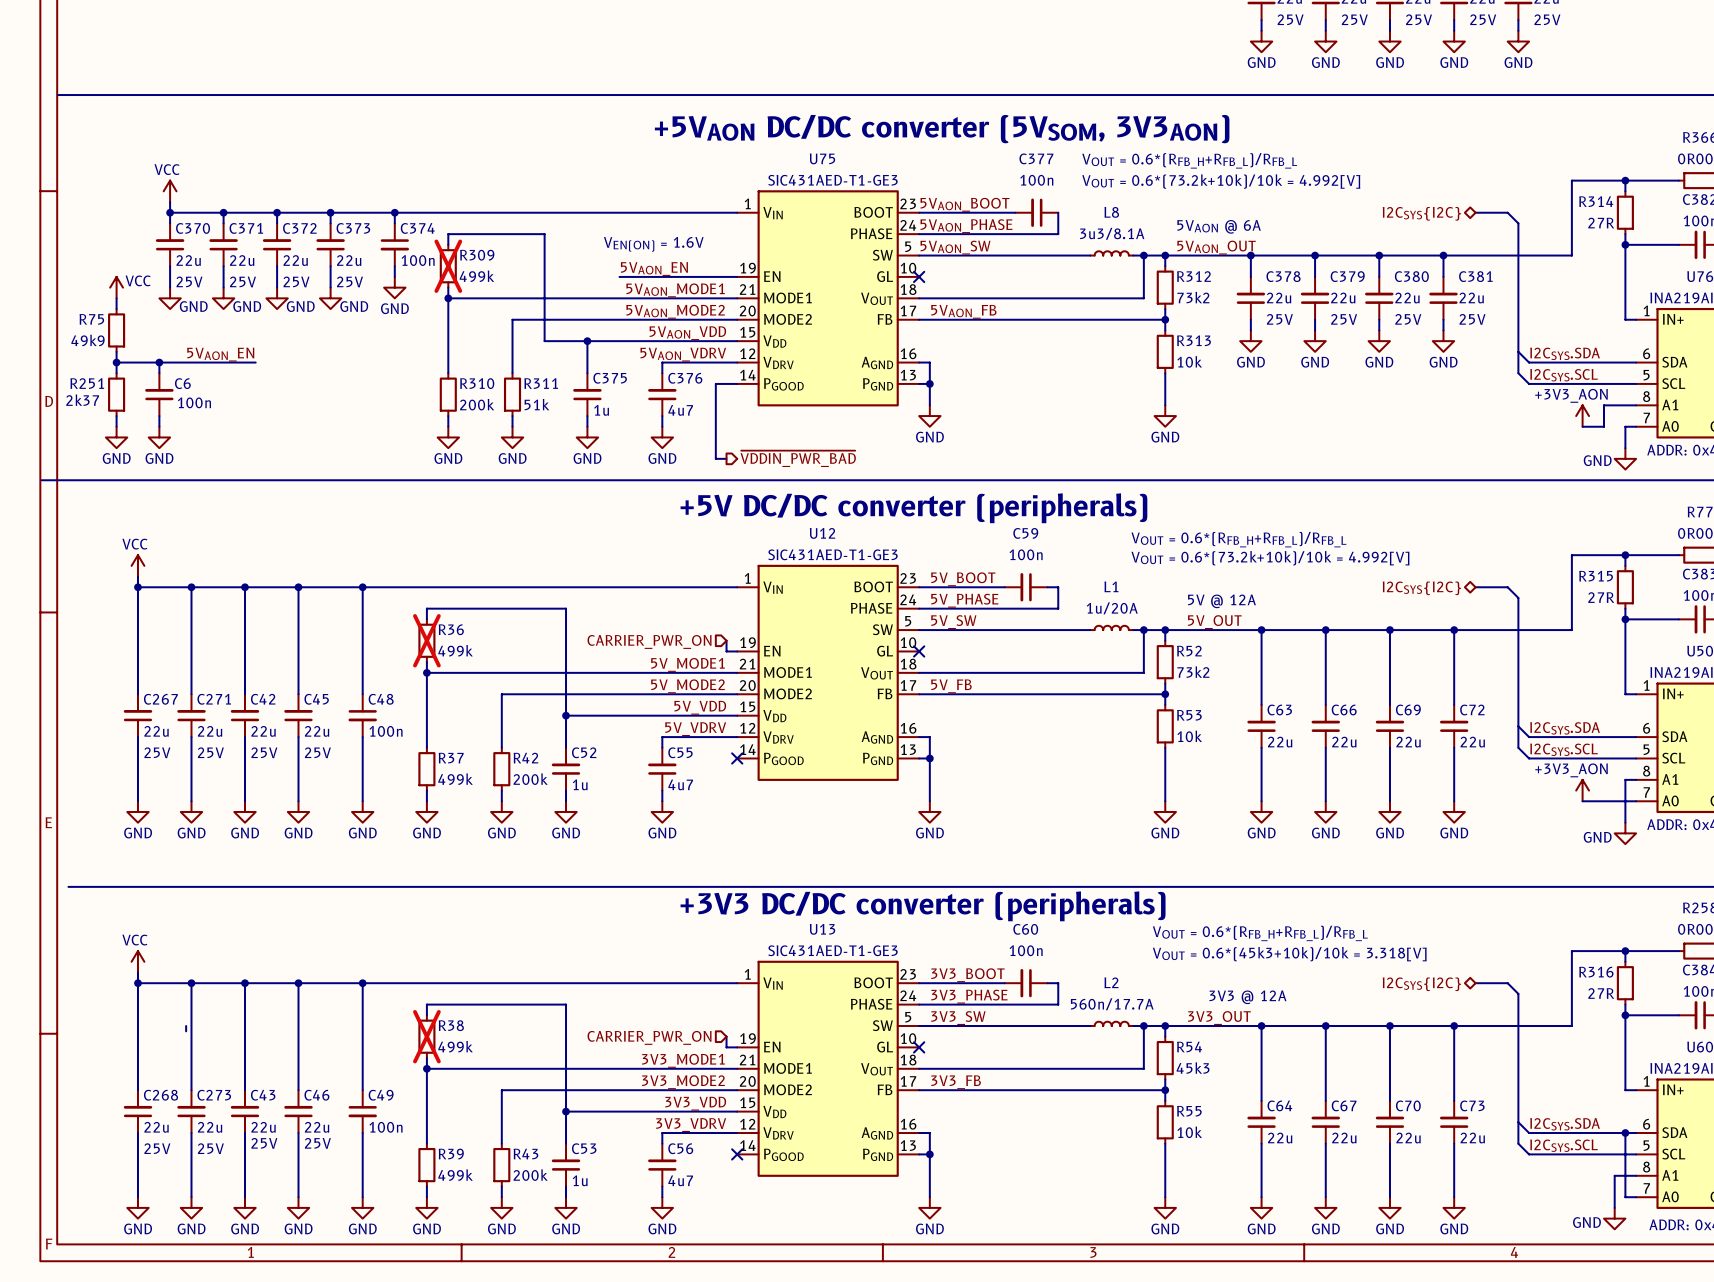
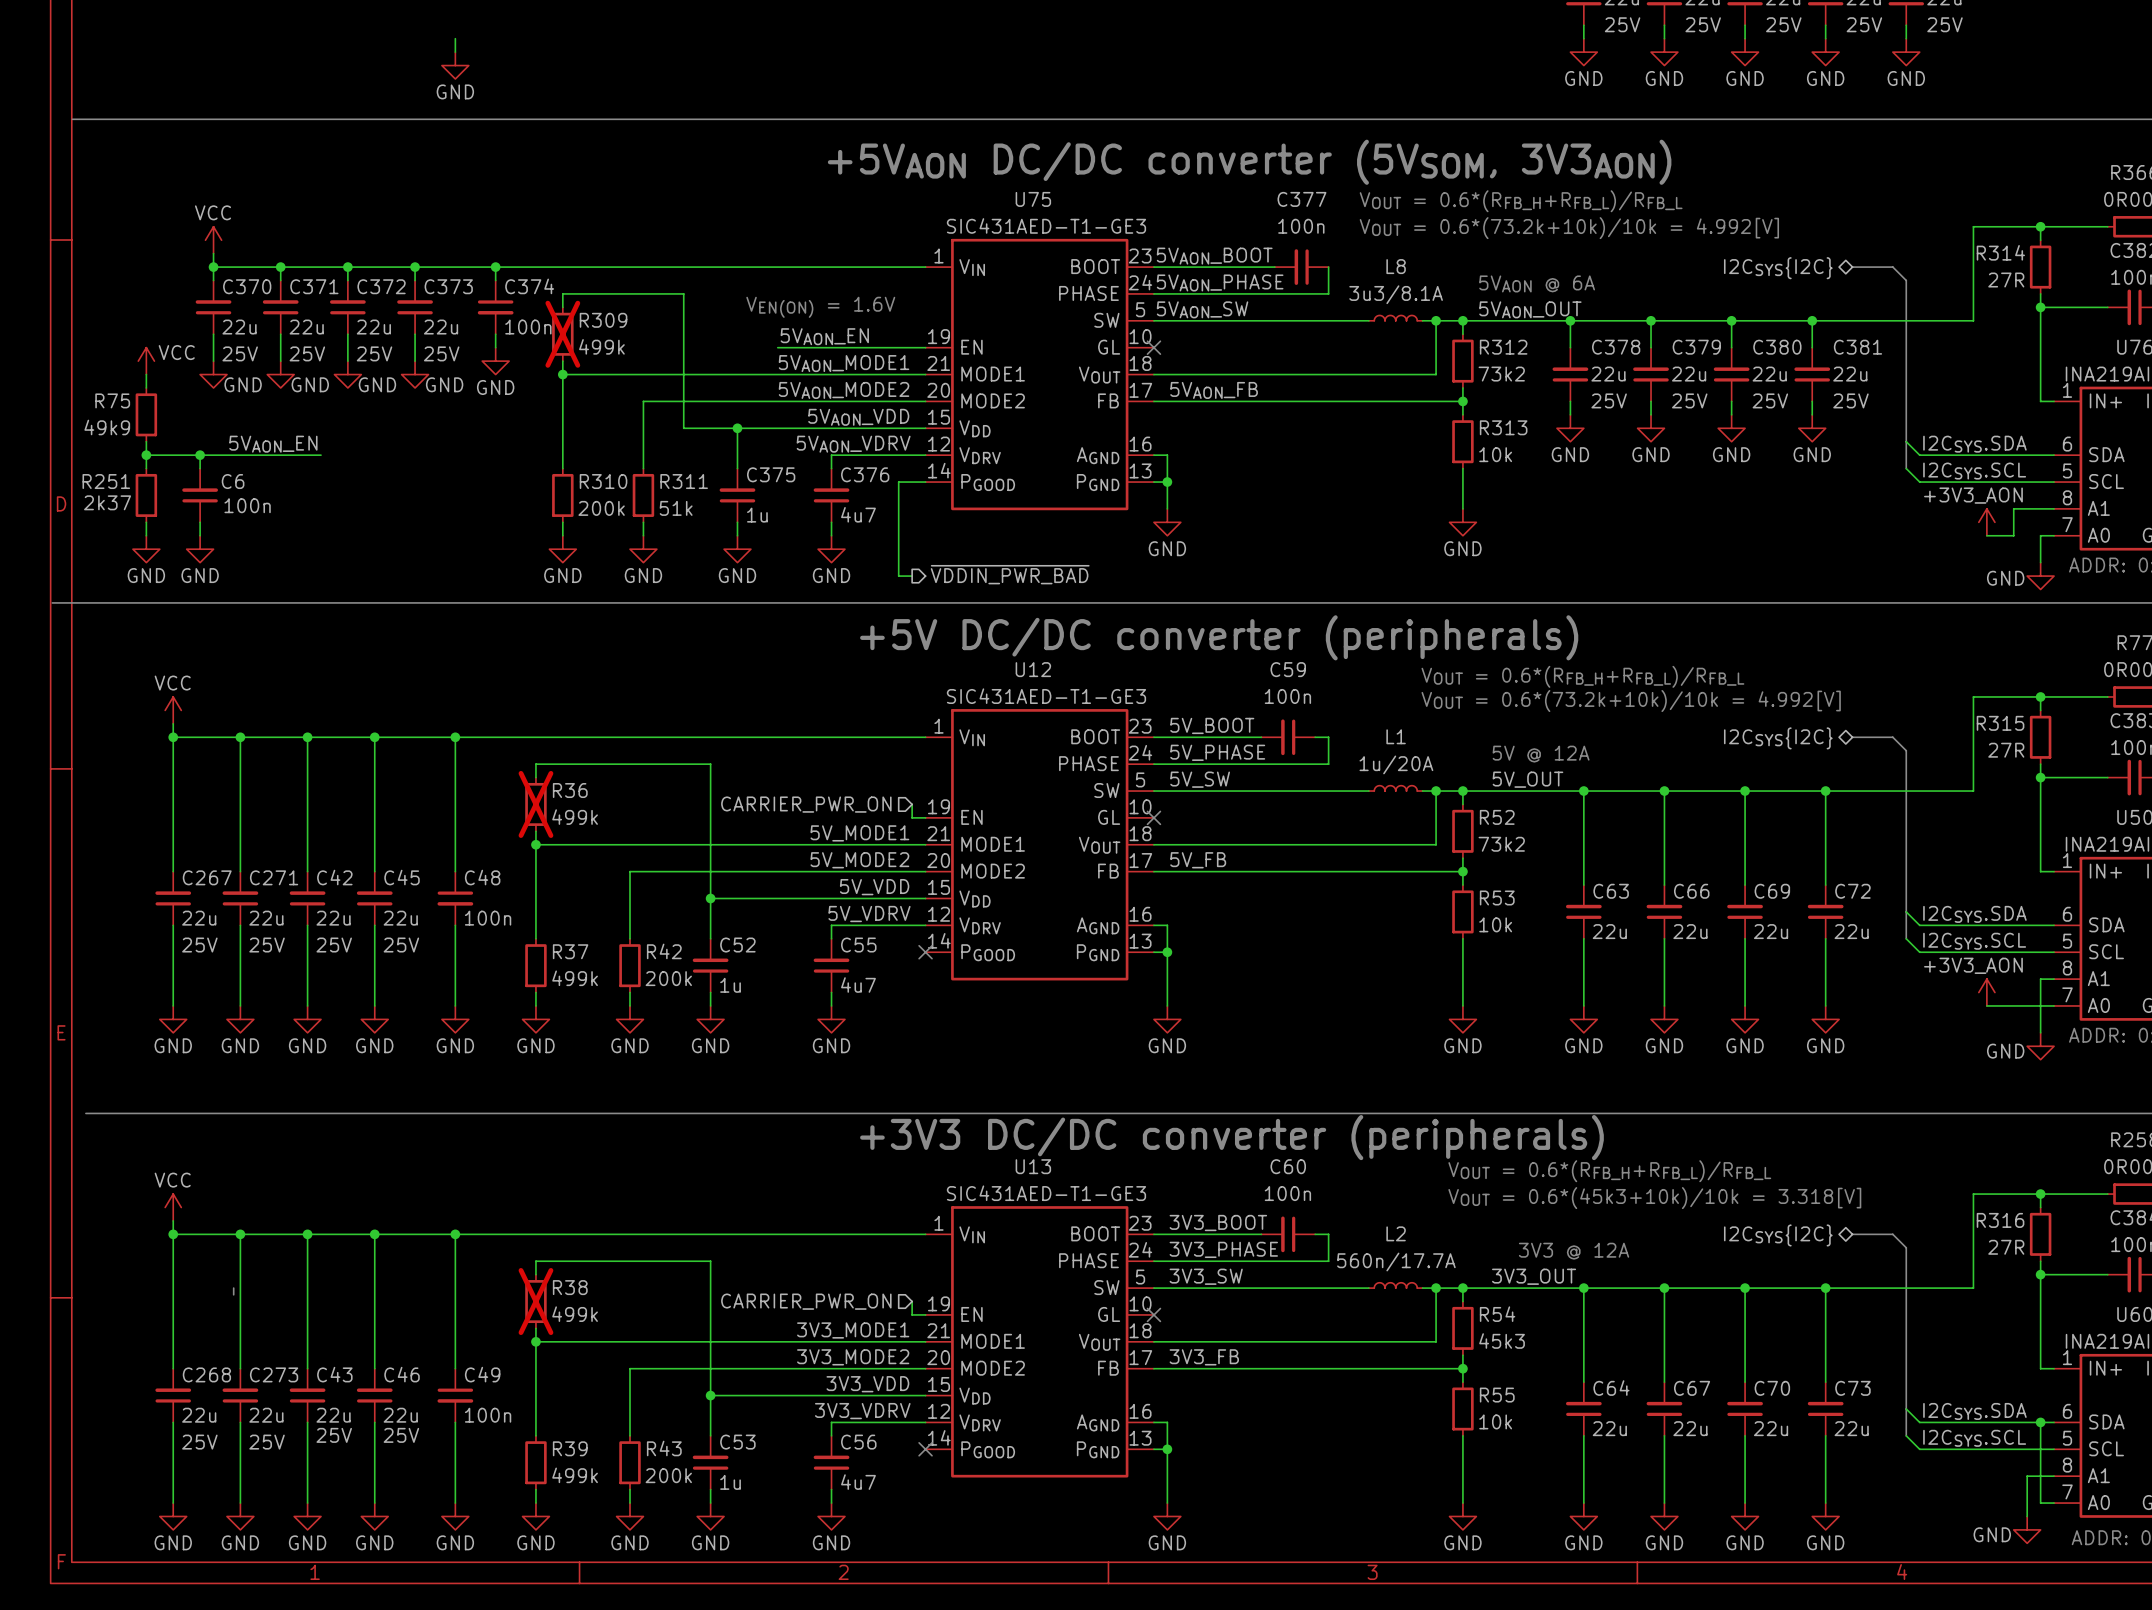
wire: none -> (455, 38) (455, 52)
power symbol: none -> GND (455, 65)

